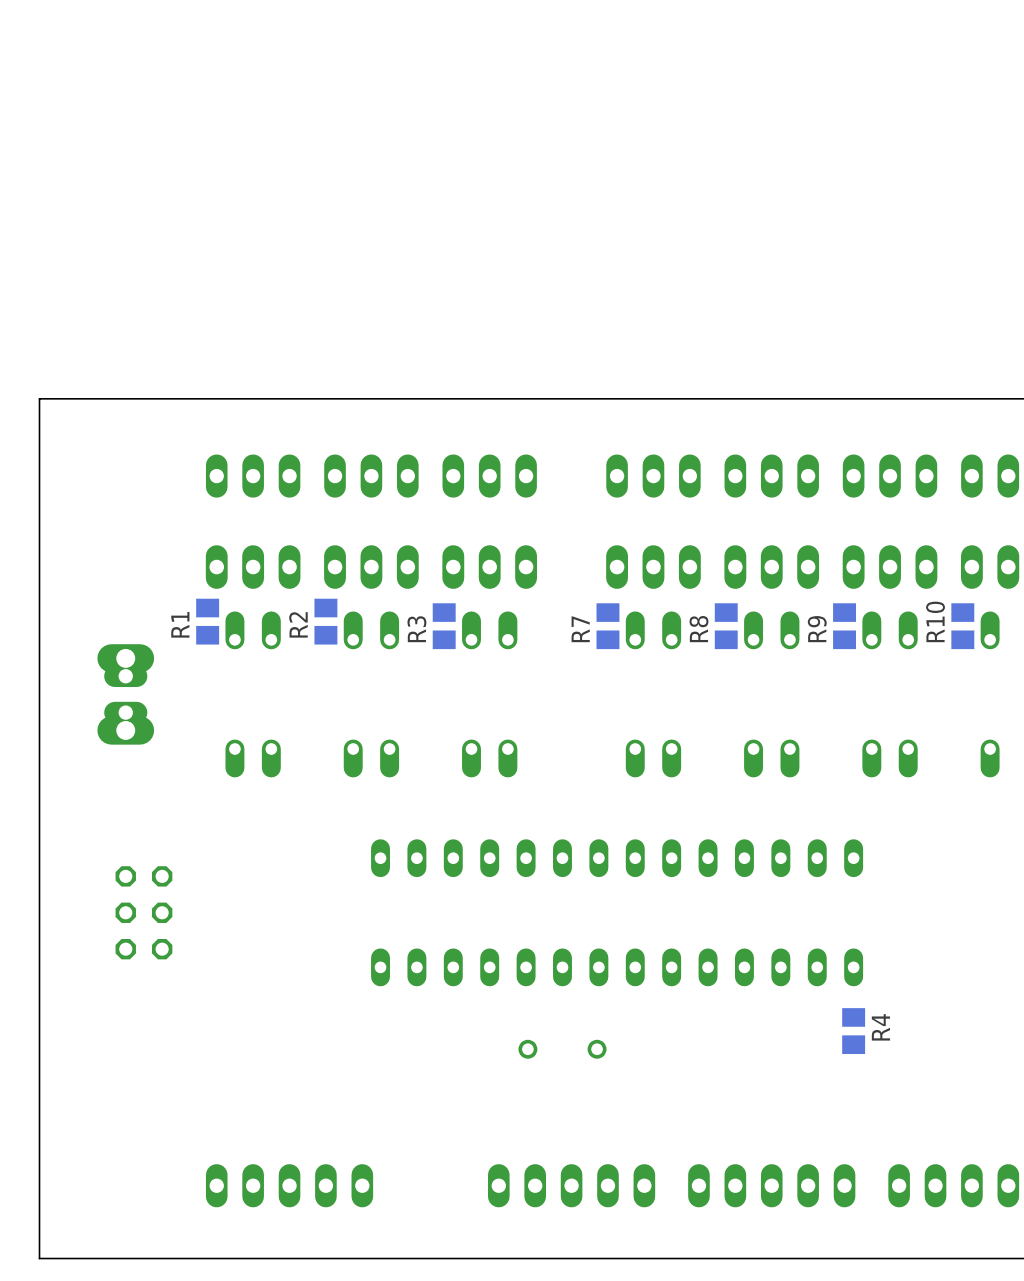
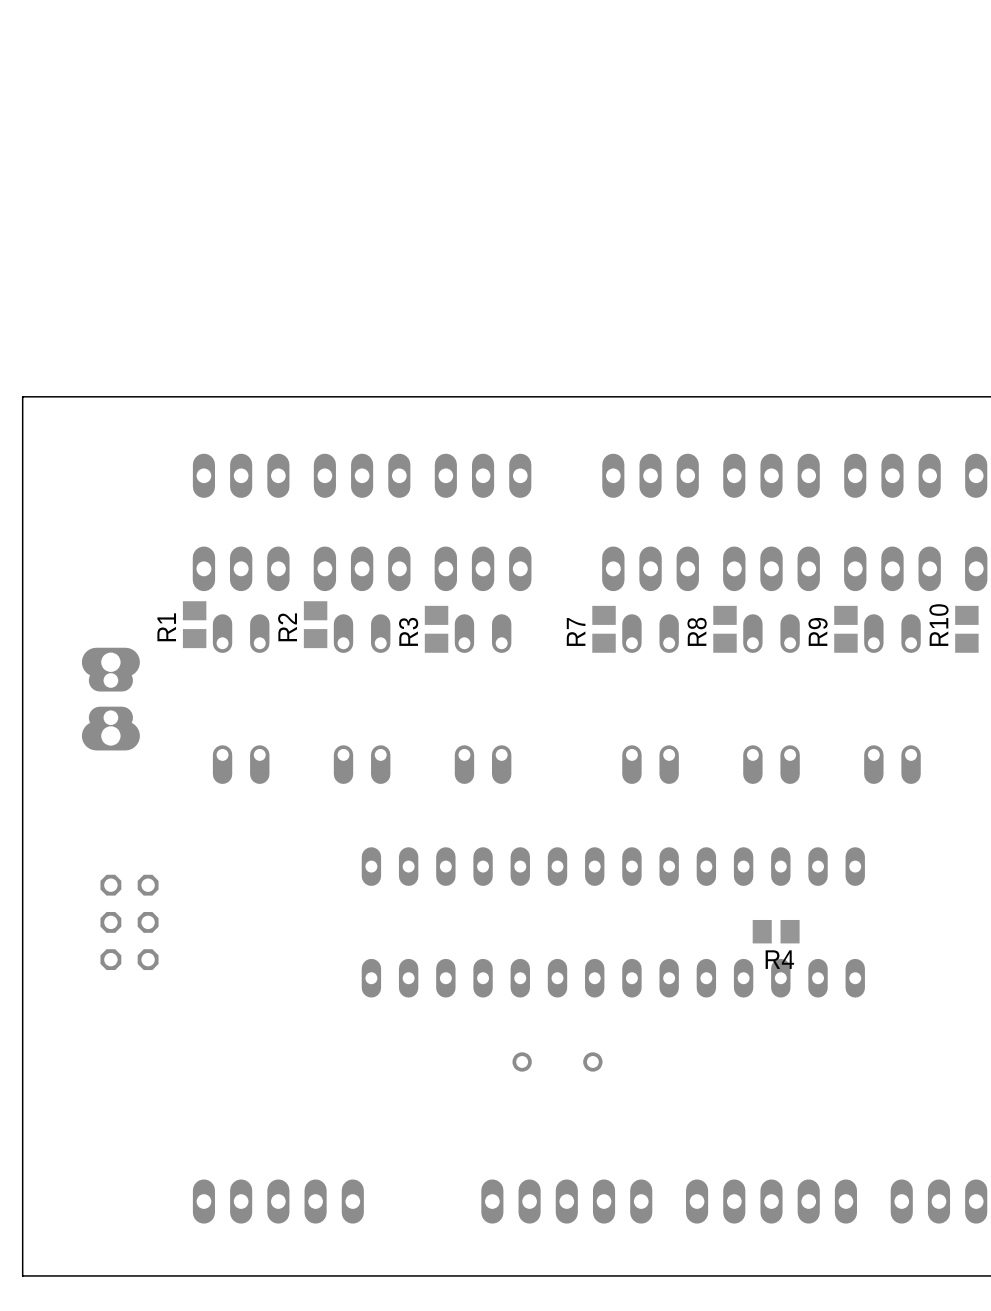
R4 rotation: 0° (853, 1031) -> 90° clockwise (776, 931)
R4 position: (853, 1031) -> (776, 931)

